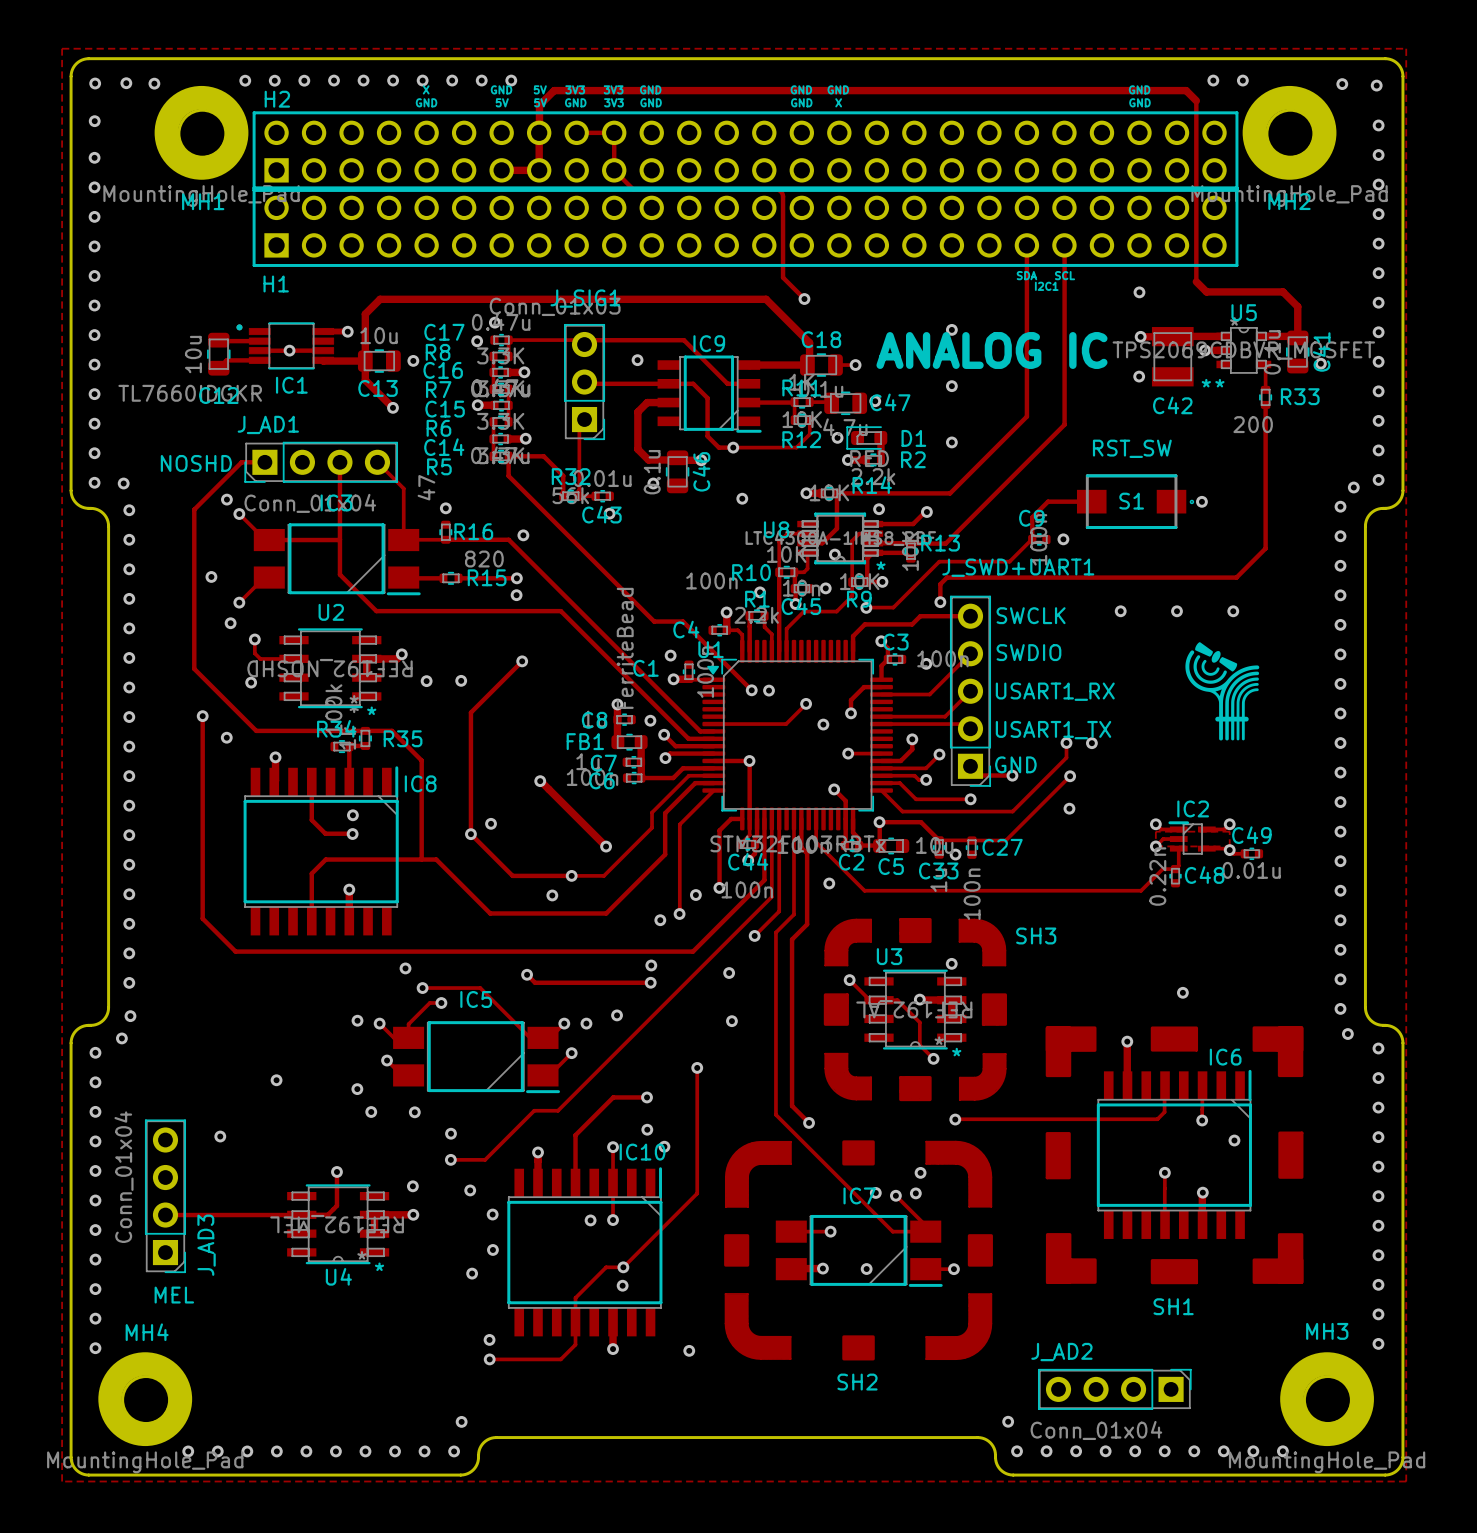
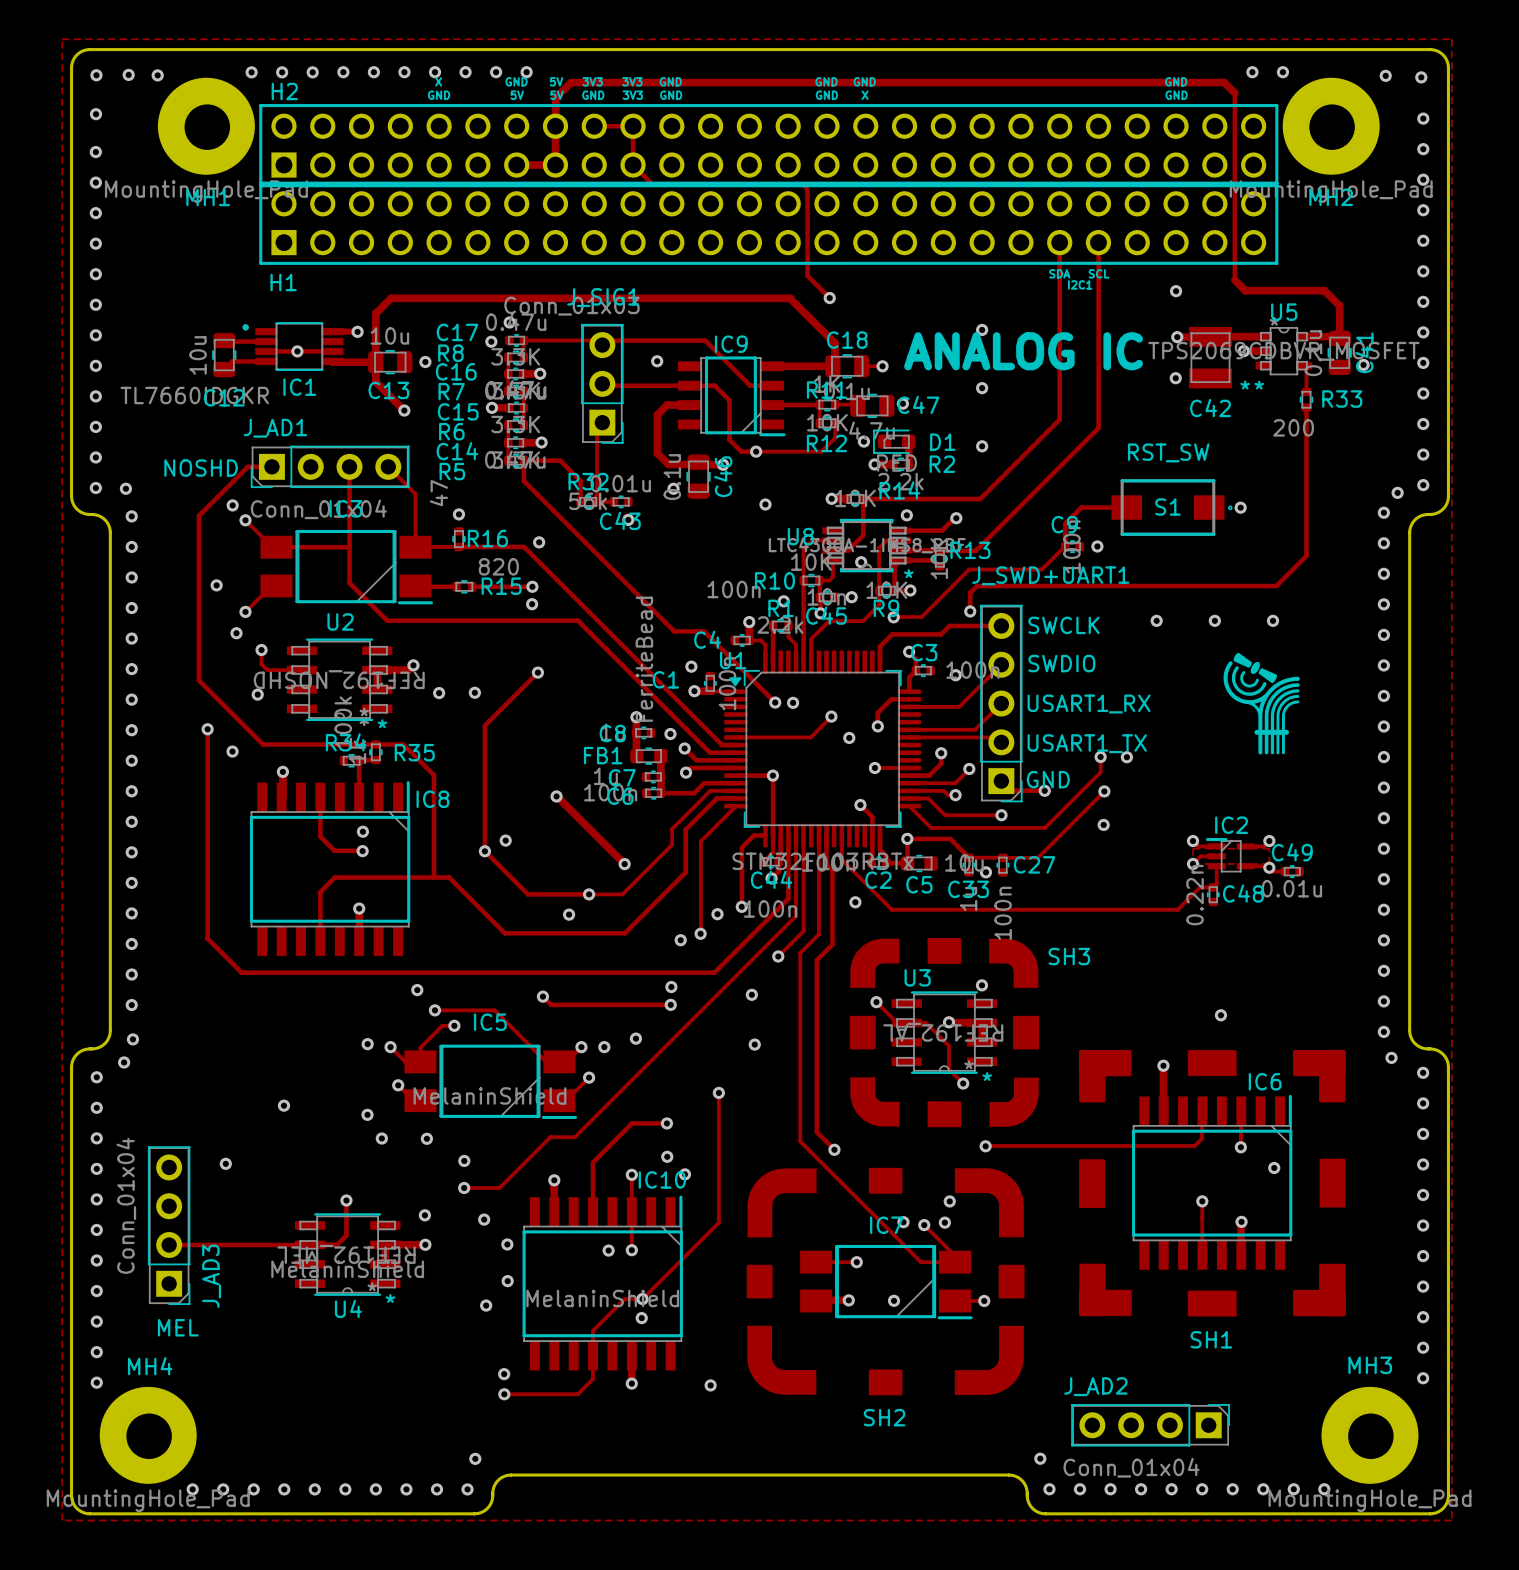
drawing: none -> [413, 1087, 567, 1105]
drawing: none -> [271, 1260, 425, 1279]
drawing: none -> [526, 1289, 680, 1308]

